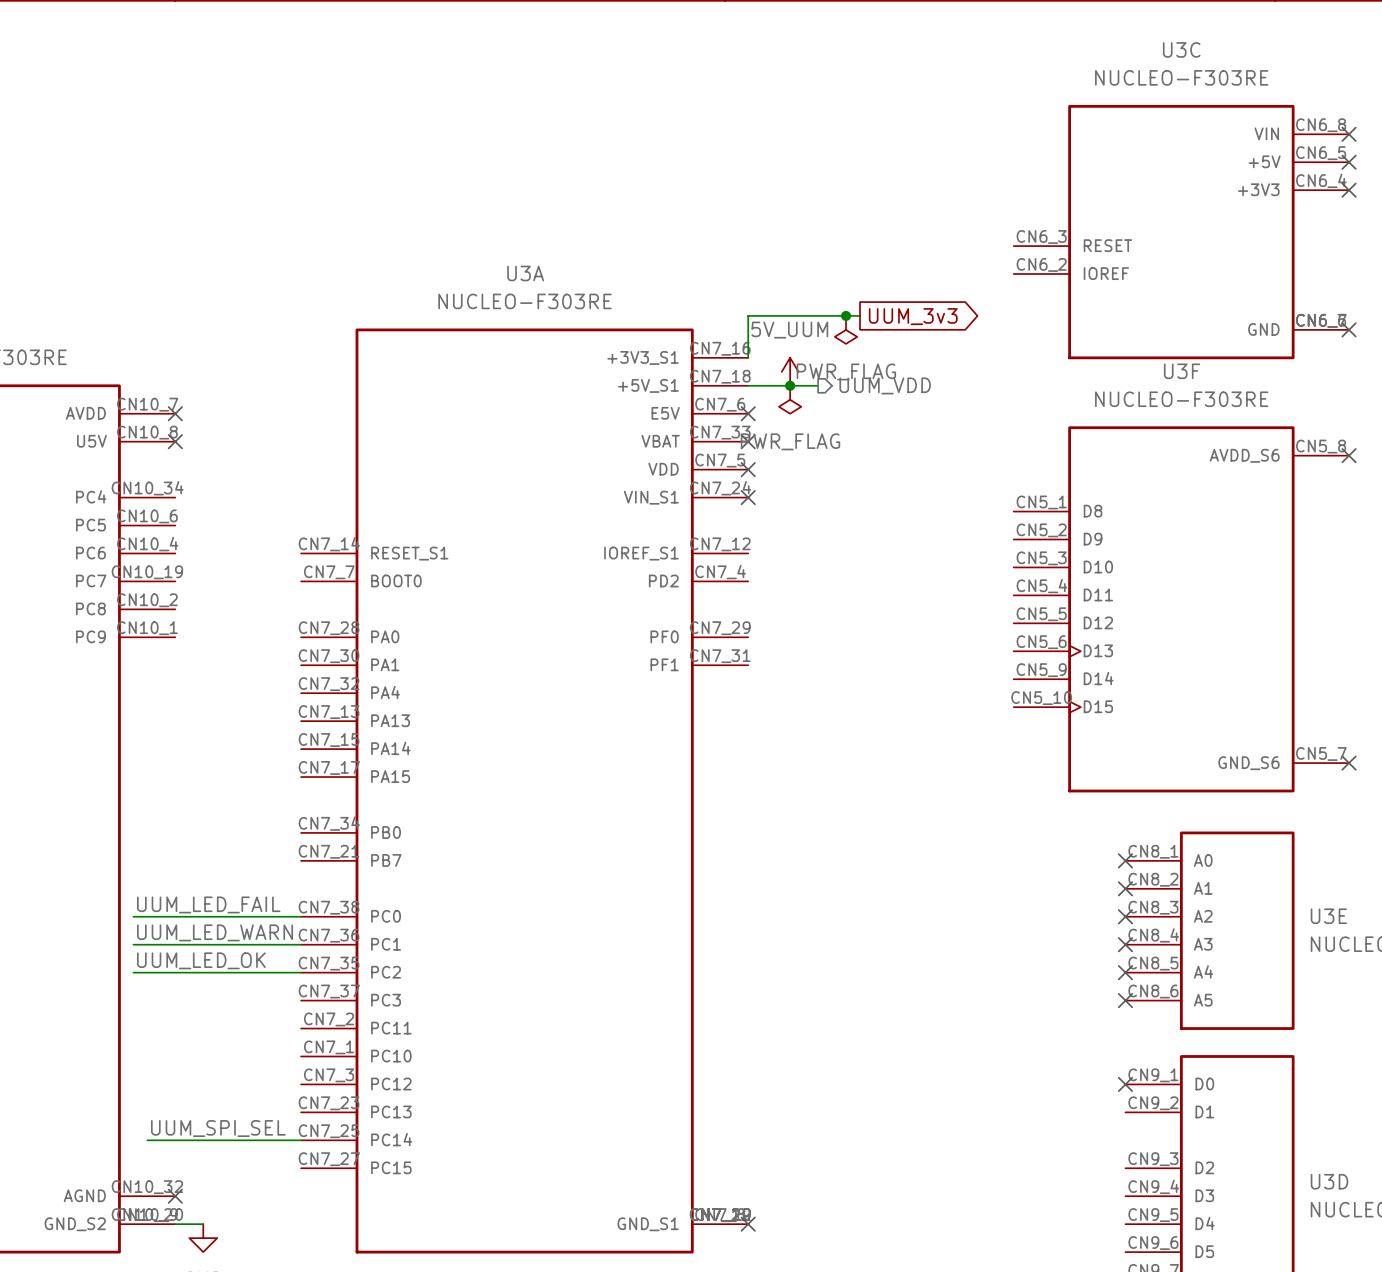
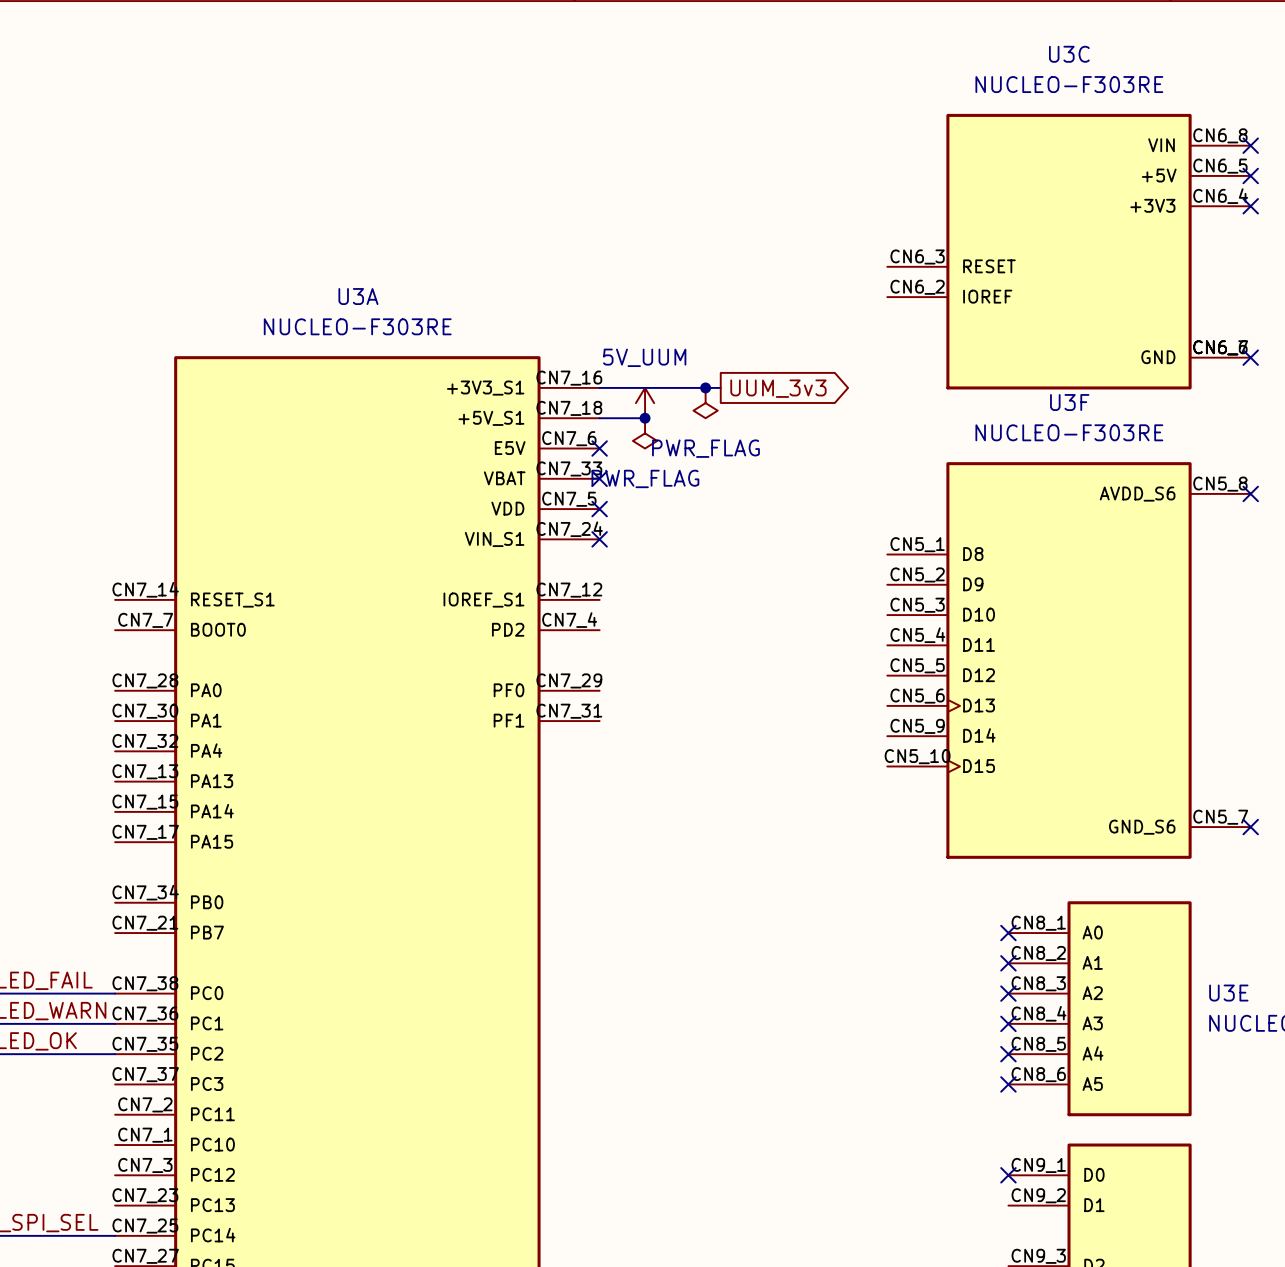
junction position: (846, 315) -> (705, 387)
wire: (860, 315) (748, 315) (748, 357) -> (720, 387) (599, 387)
global label position: UUM_3v3 (913, 316) -> UUM_3v3 (778, 388)
power symbol position: PWR_FLAG (846, 329) -> PWR_FLAG (705, 403)
wire: (790, 385) (818, 385) -> none
hierarchical label: UUM_VDD (885, 385) -> none

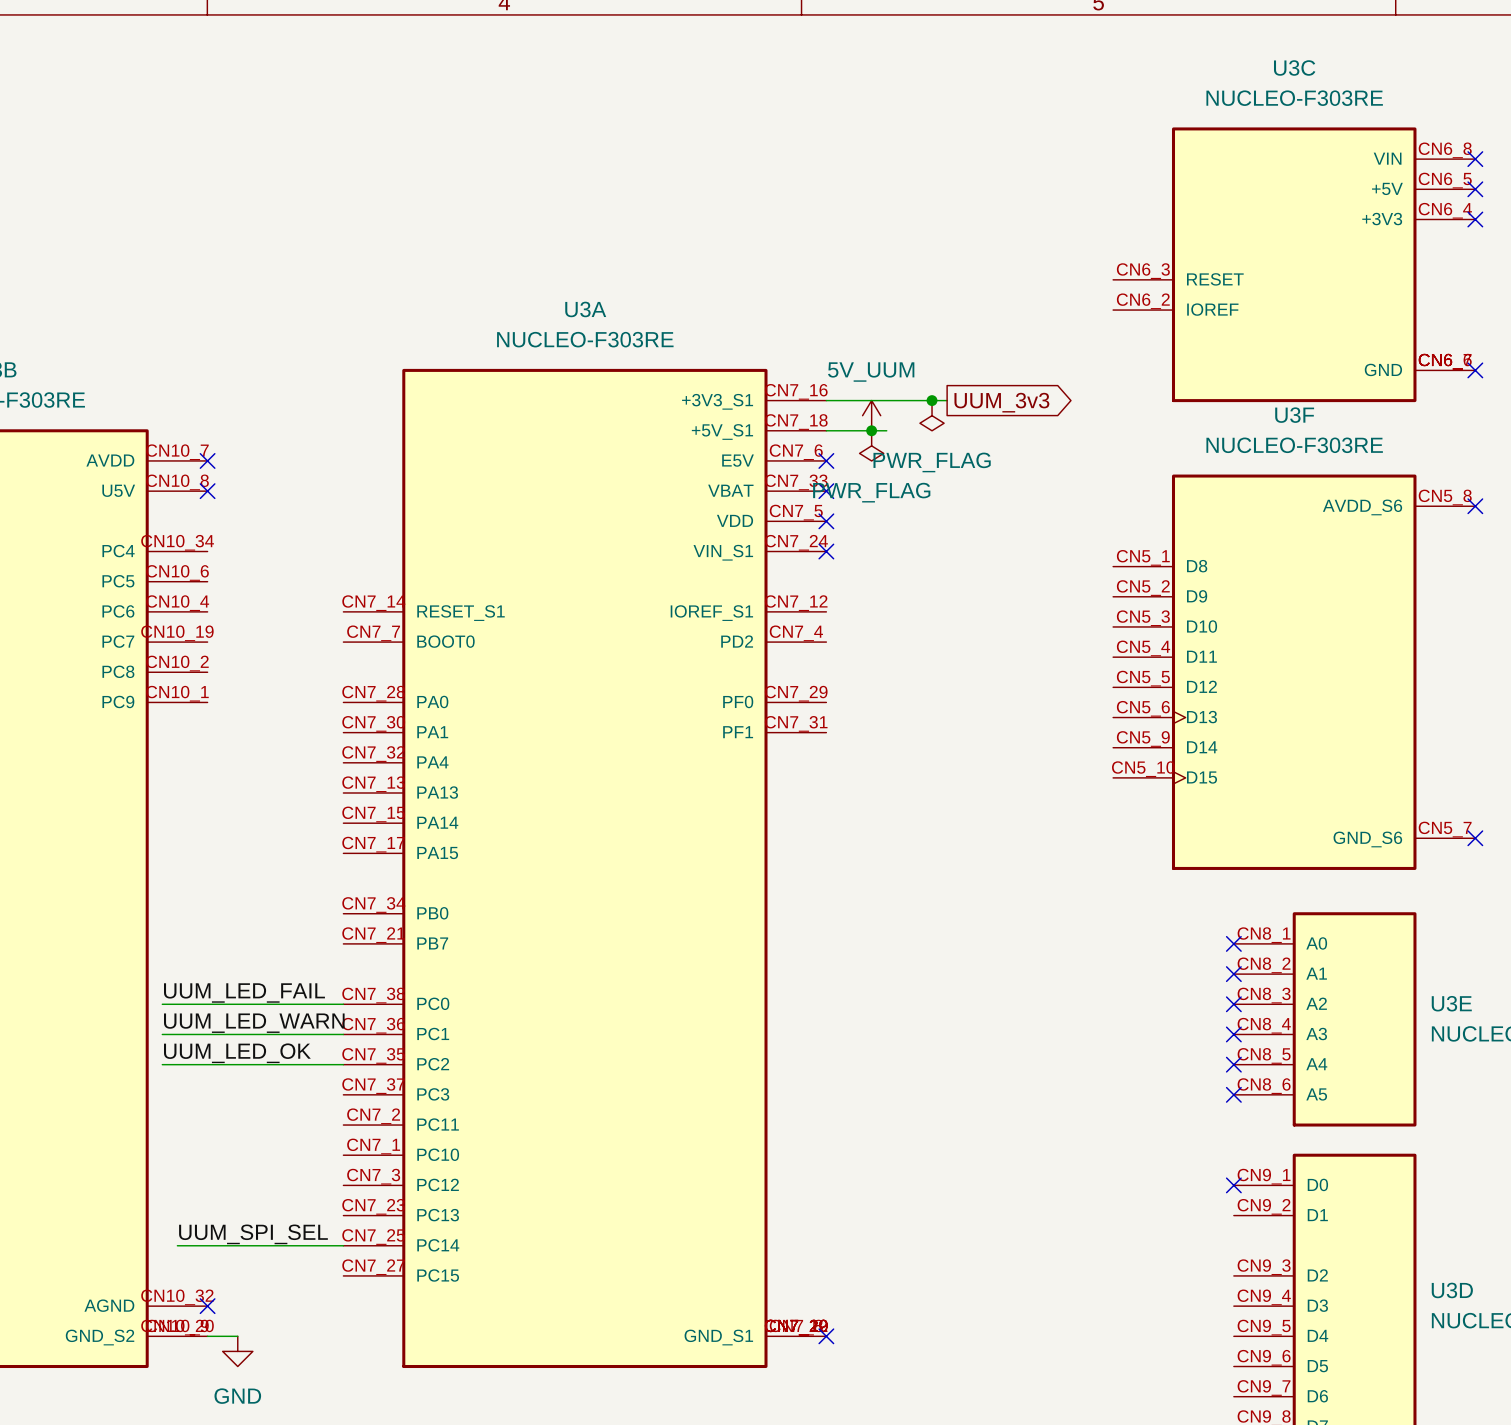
wire: none -> (871, 430) (886, 430)

